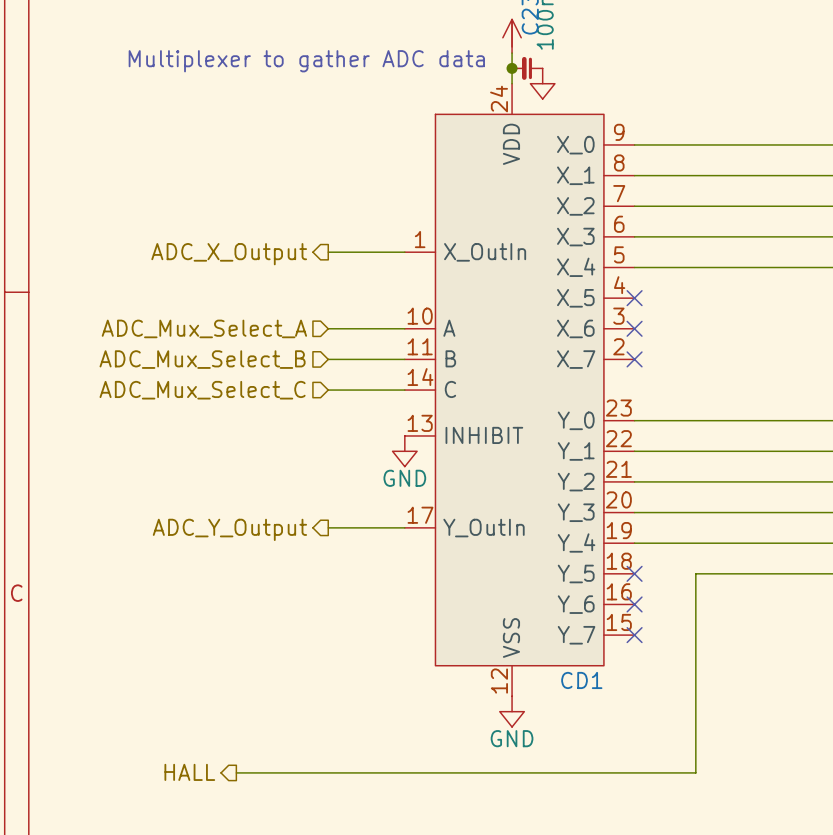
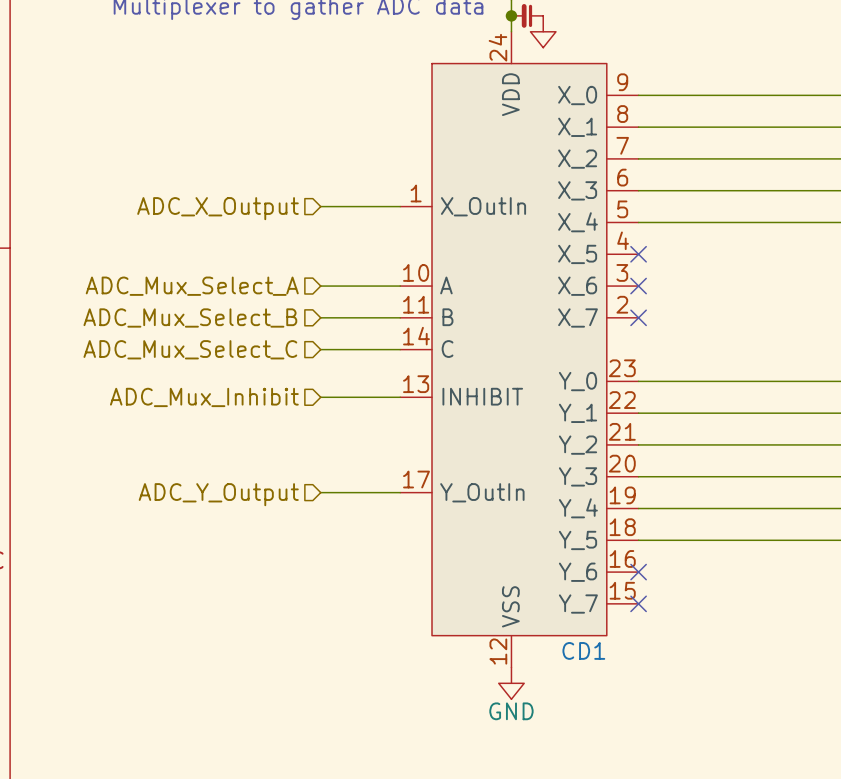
hierarchical label shape: output (229, 254) -> input (217, 208)
wire: none -> (320, 397) (400, 397)
hierarchical label: none -> ADC_Mux_Inhibit (204, 397)
power symbol: GND (404, 451) -> none
hierarchical label shape: output (229, 529) -> input (218, 494)
no-connect mark: (634, 573) -> none
wire: (695, 573) (695, 772) (236, 772) -> (702, 540) (638, 540)
hierarchical label: HALL (189, 772) -> none

